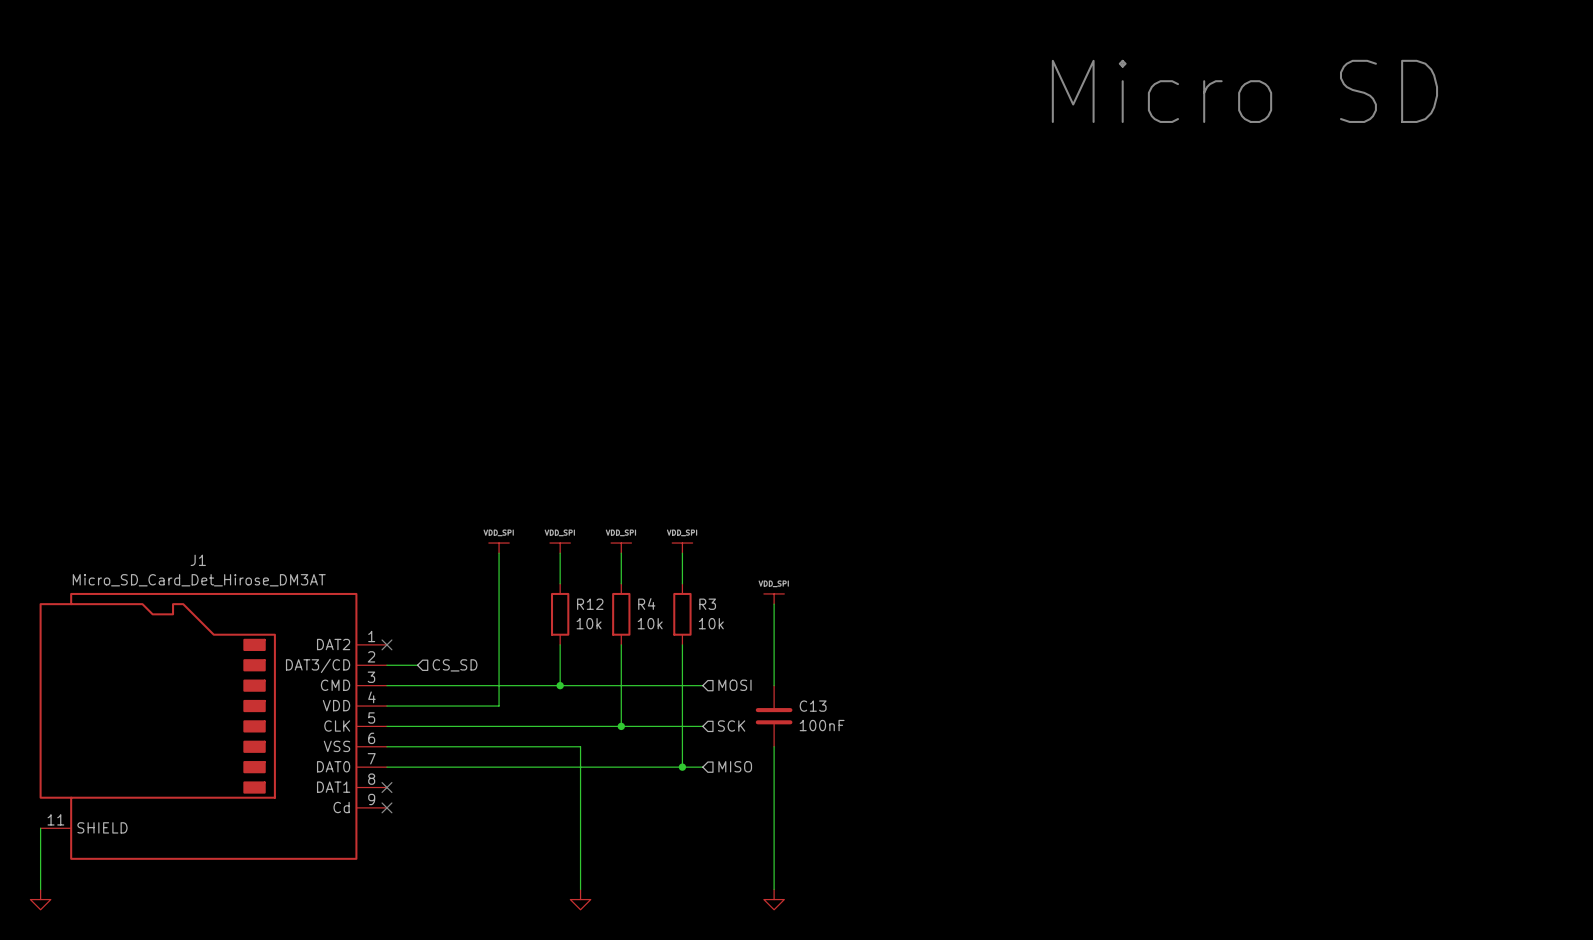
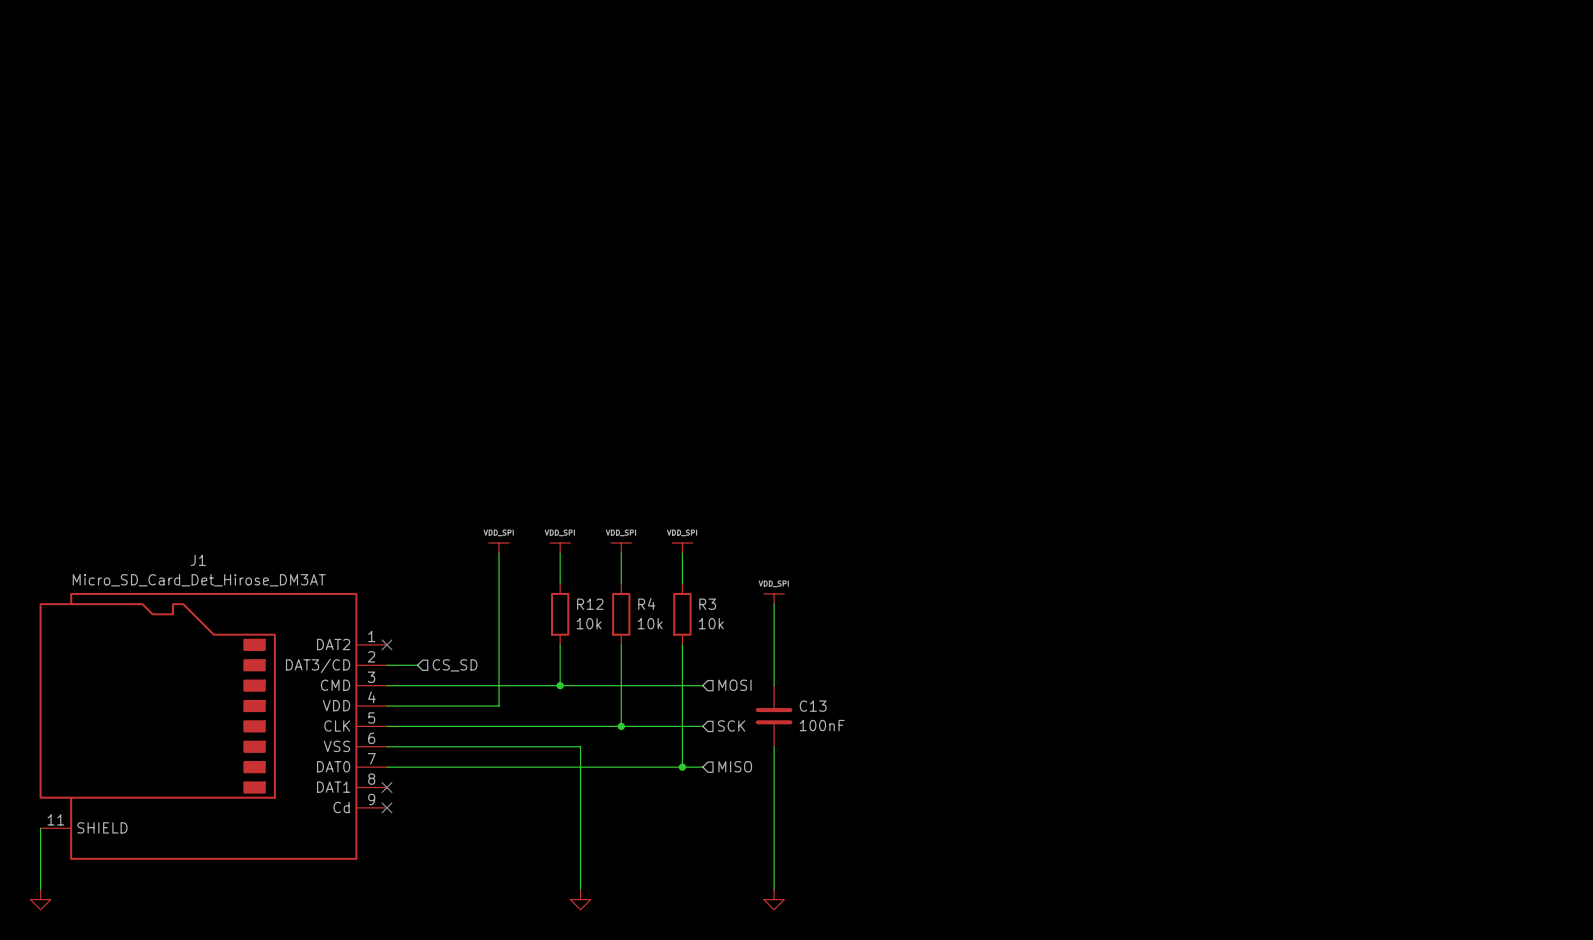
text: Micro SD (1244, 91) -> none

